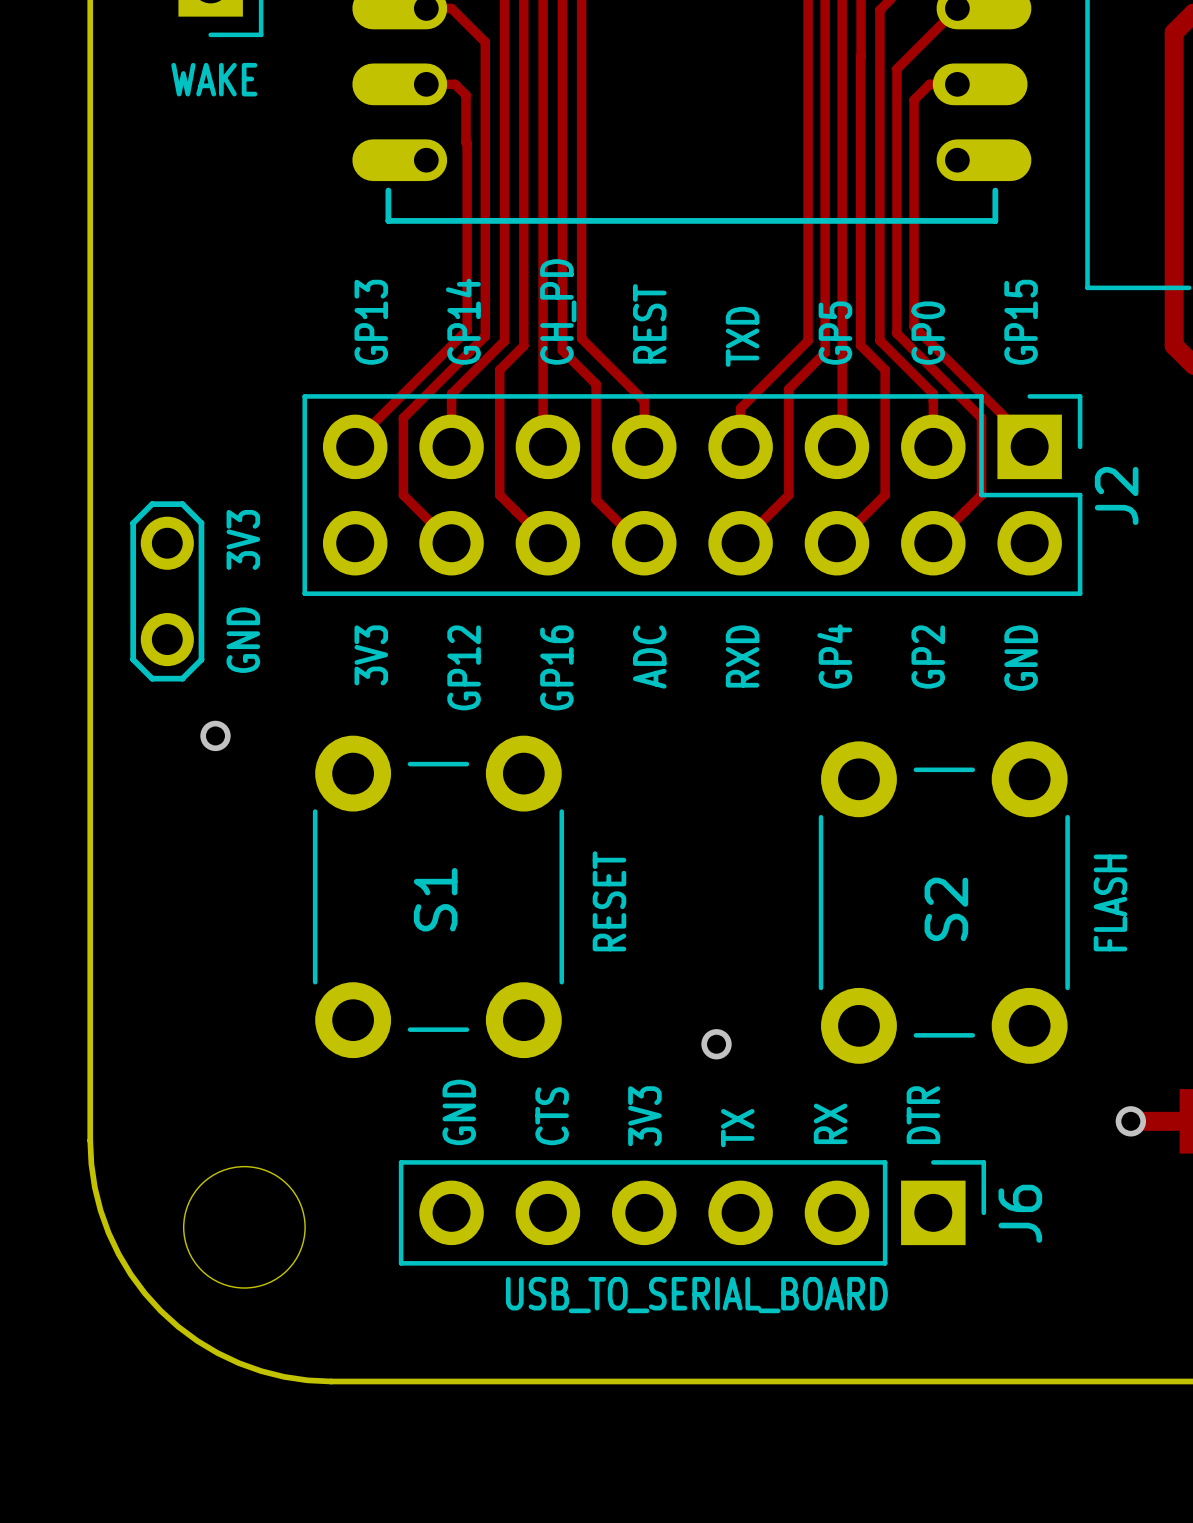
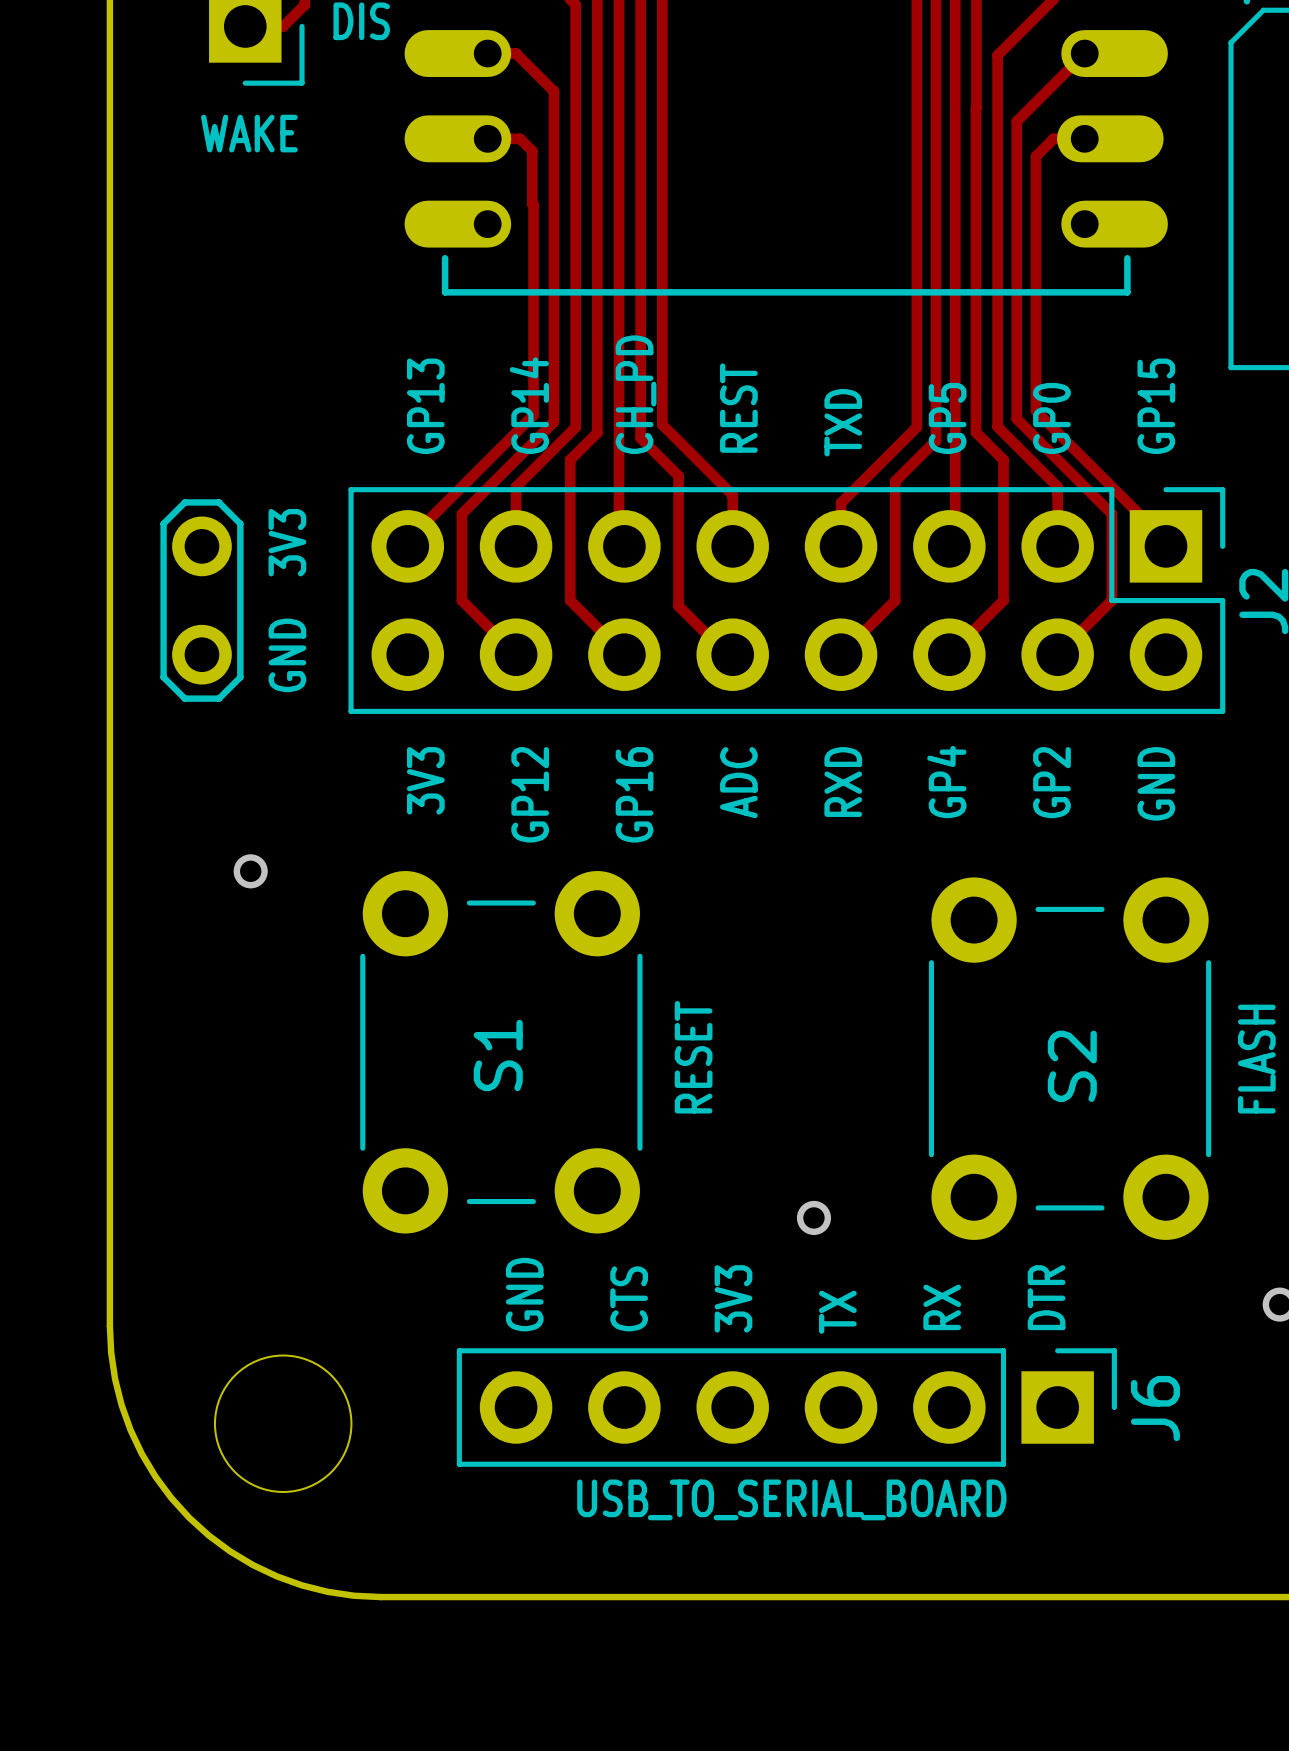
part position: (167, 591) -> (201, 600)
text position: GND 3V3 (243, 591) -> GND 3V3 (287, 600)

